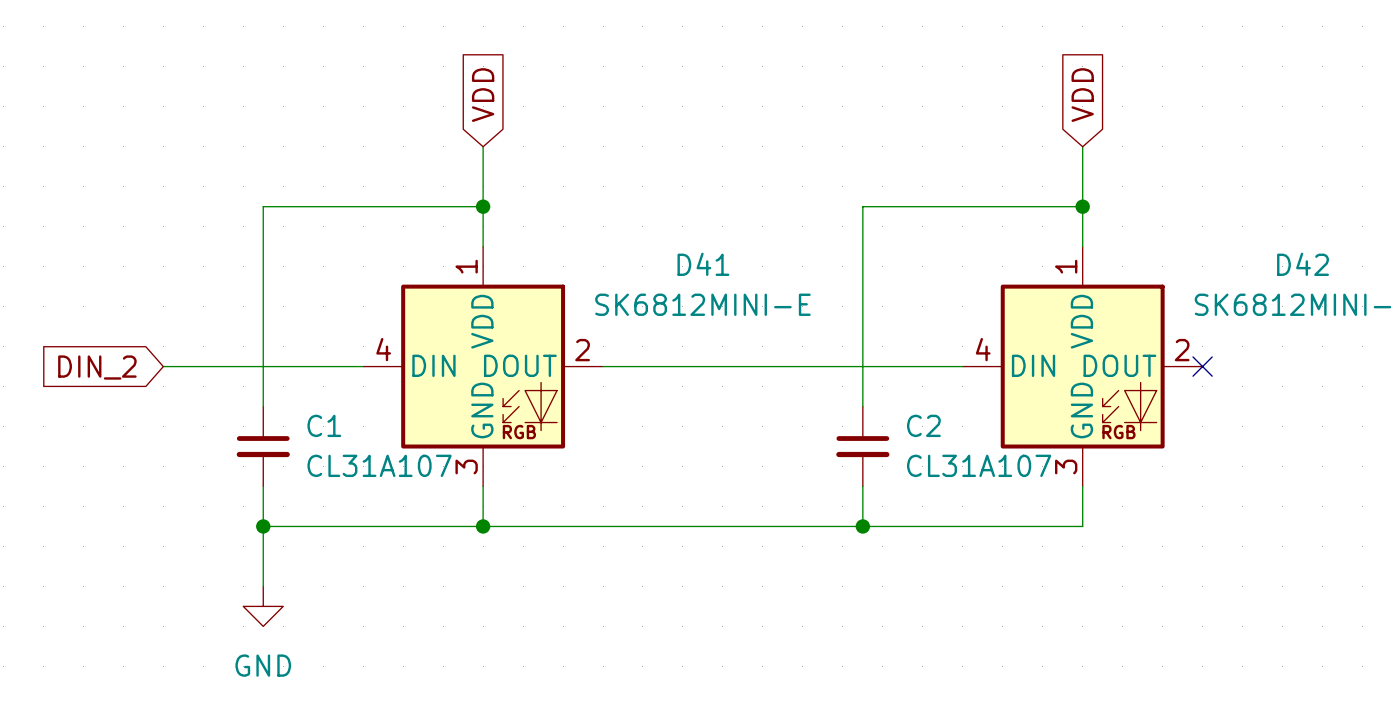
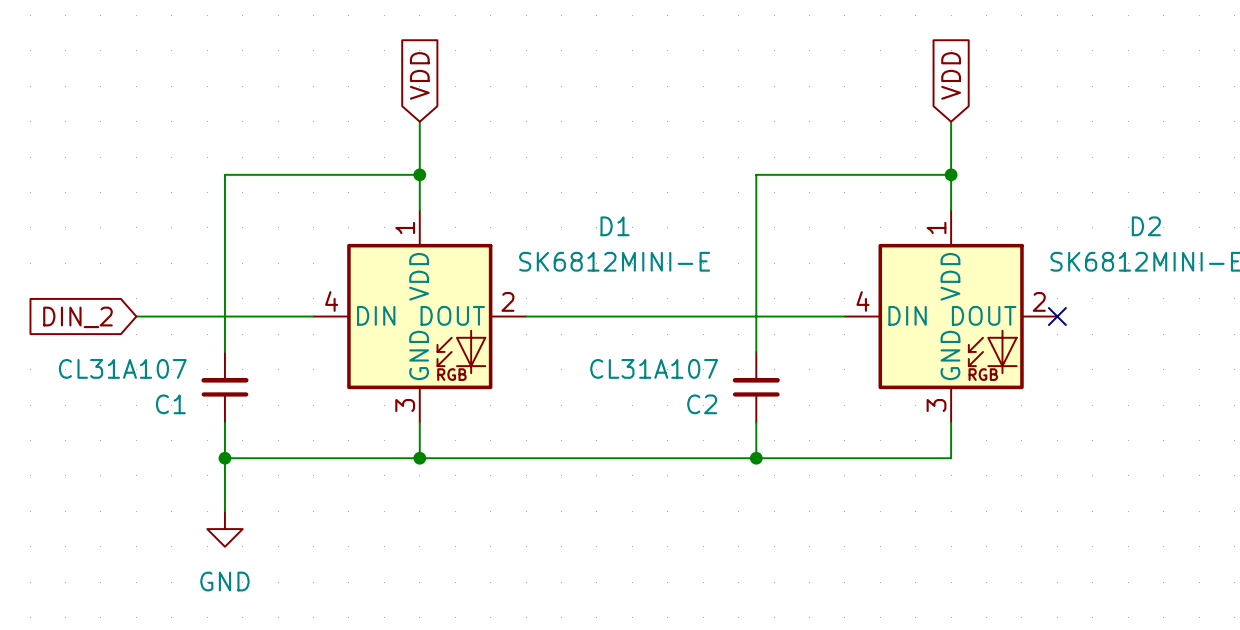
D41 name: D41 (703, 264) -> D1 (615, 226)
D42 name: D42 (1303, 264) -> D2 (1146, 226)
C1 rotation: 0° (263, 446) -> 180° (224, 387)
C2 rotation: 0° (862, 446) -> 180° (756, 387)

